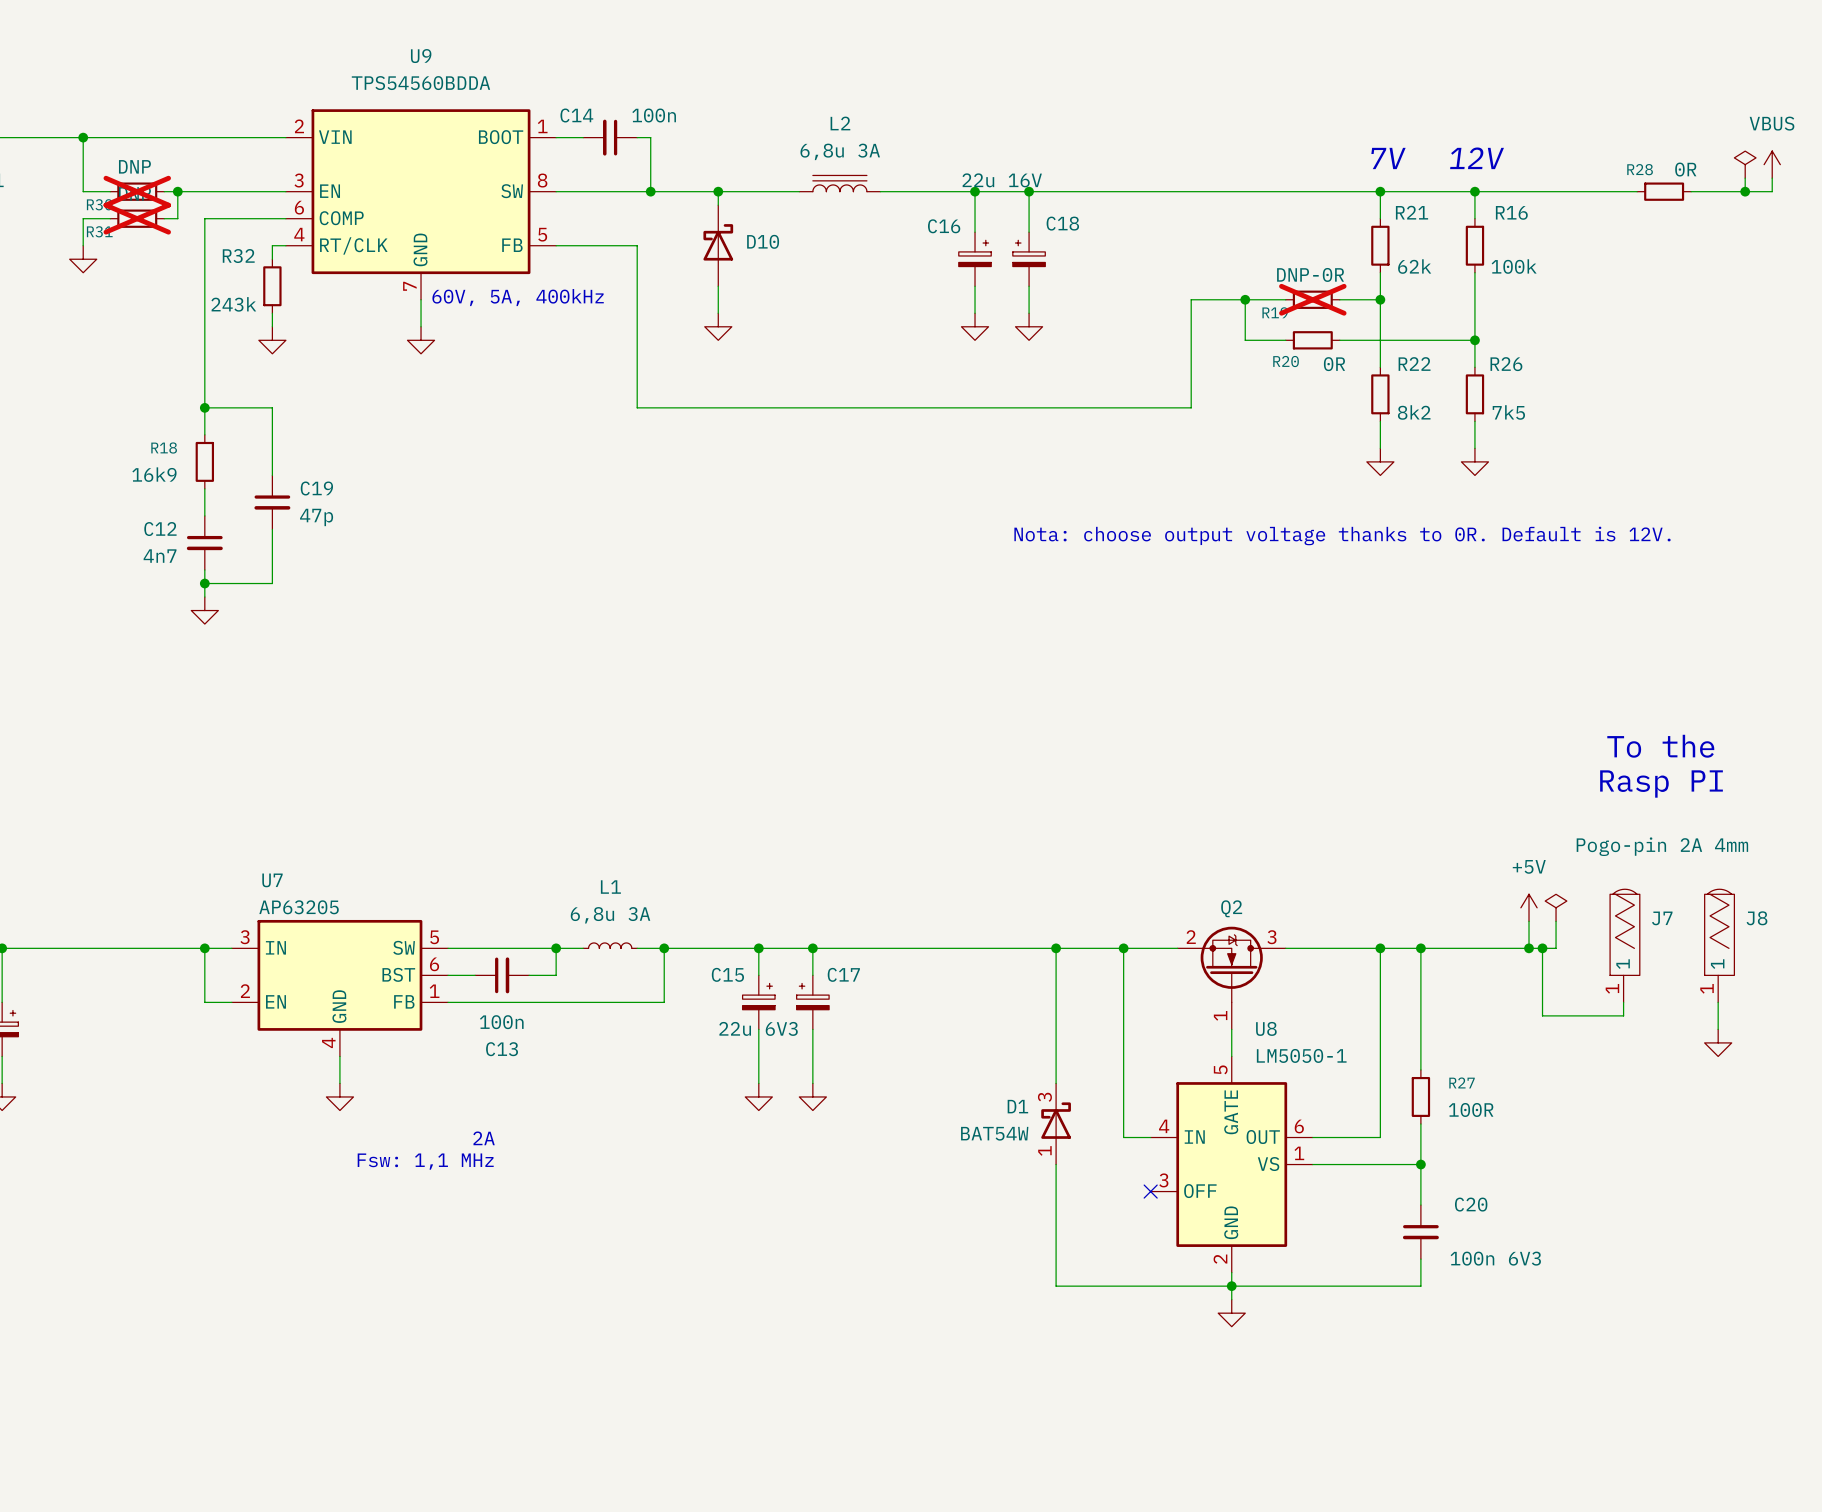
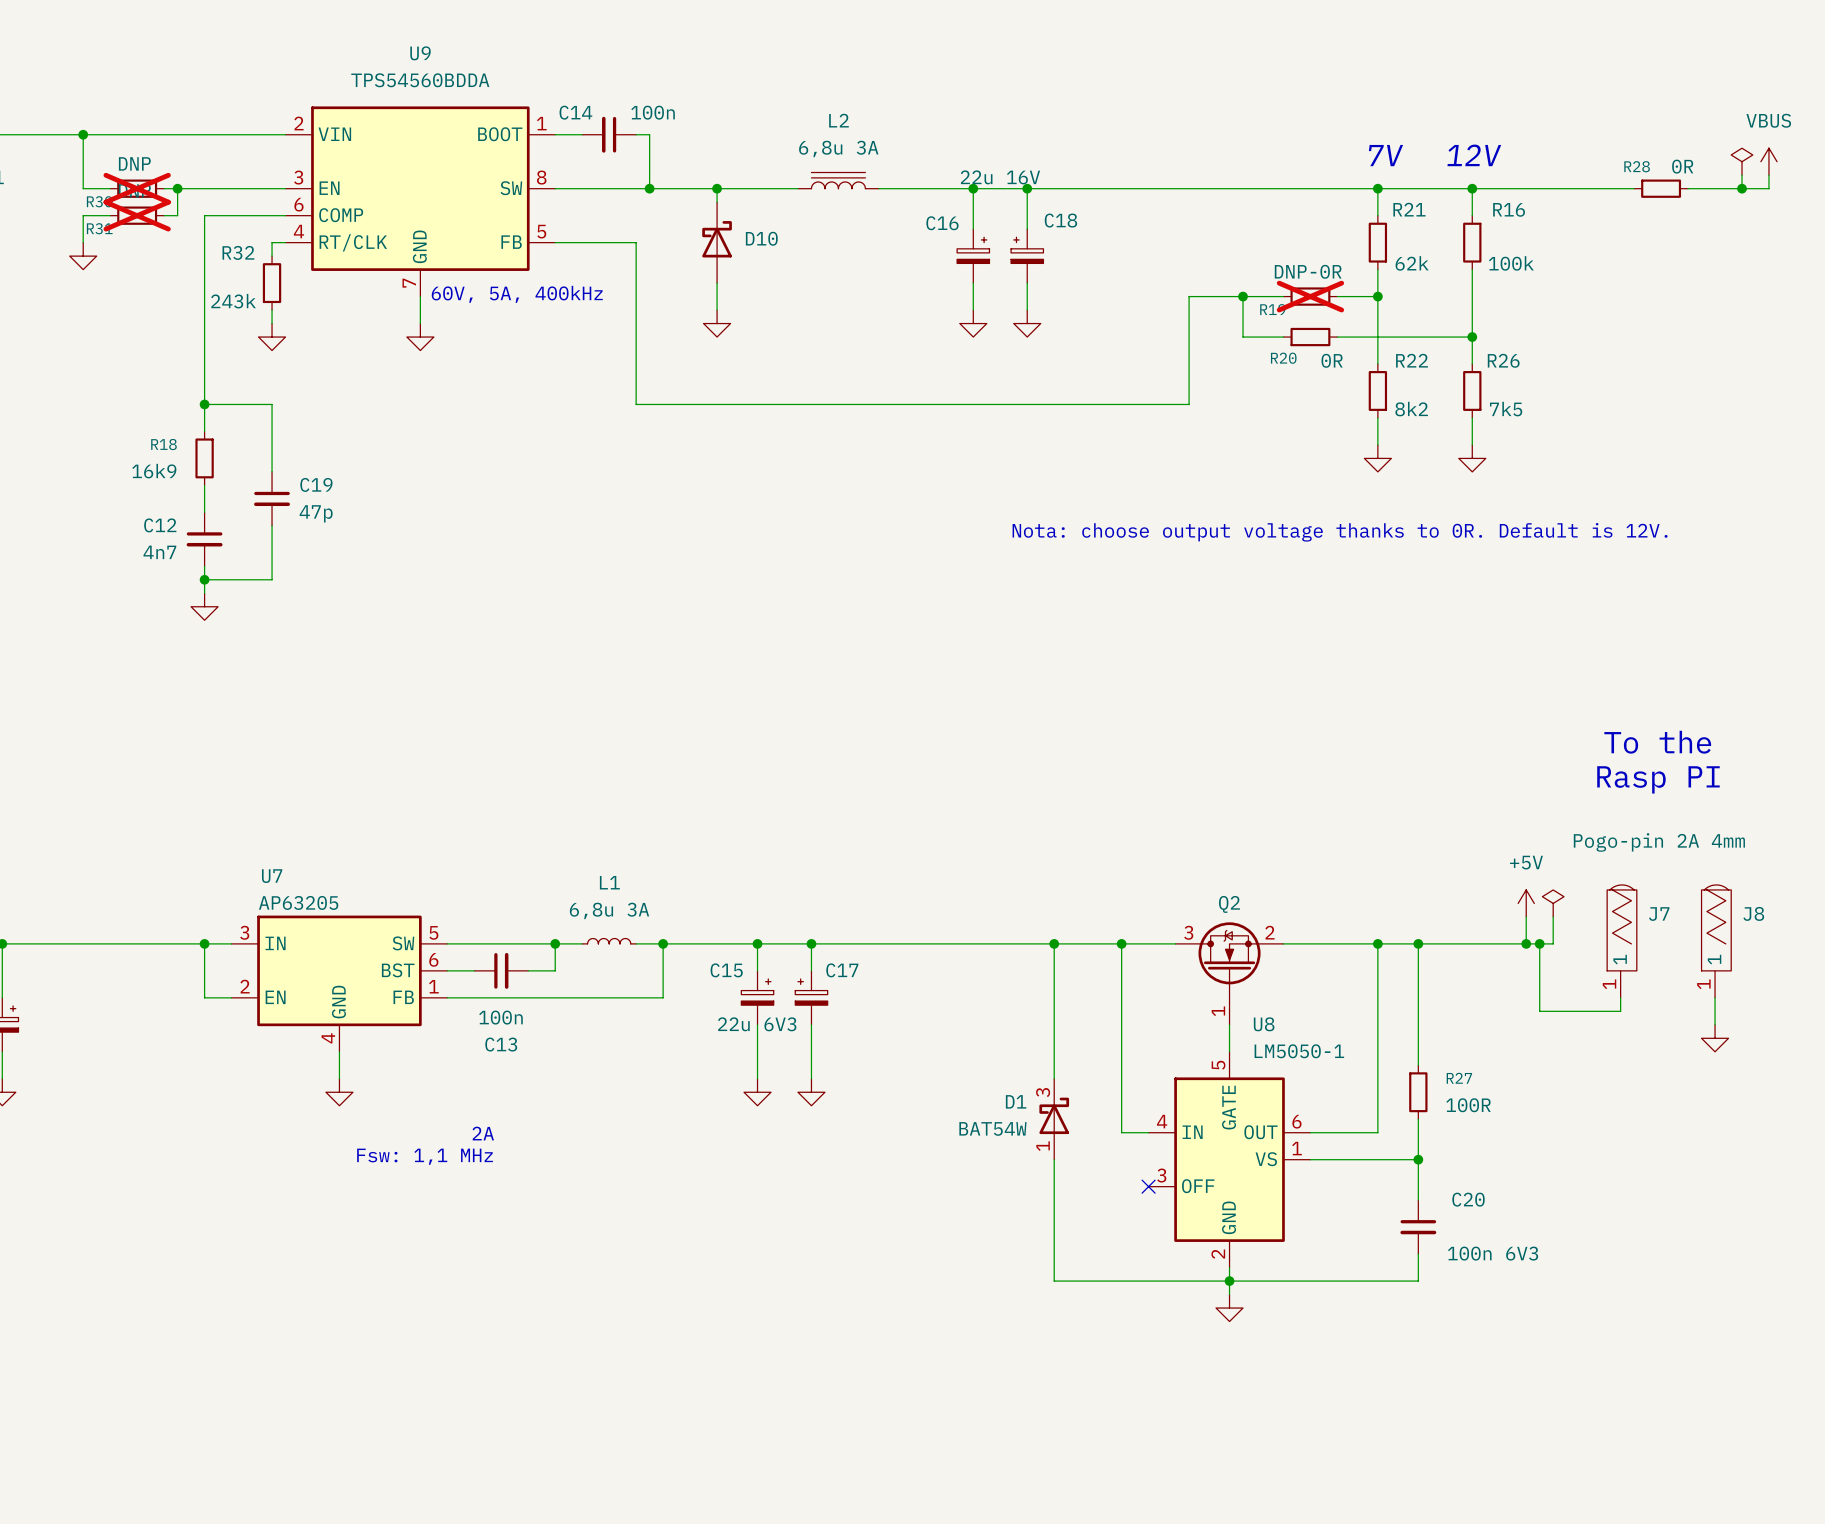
Q2 flip: as is (1231, 964) -> left-right (1229, 960)

